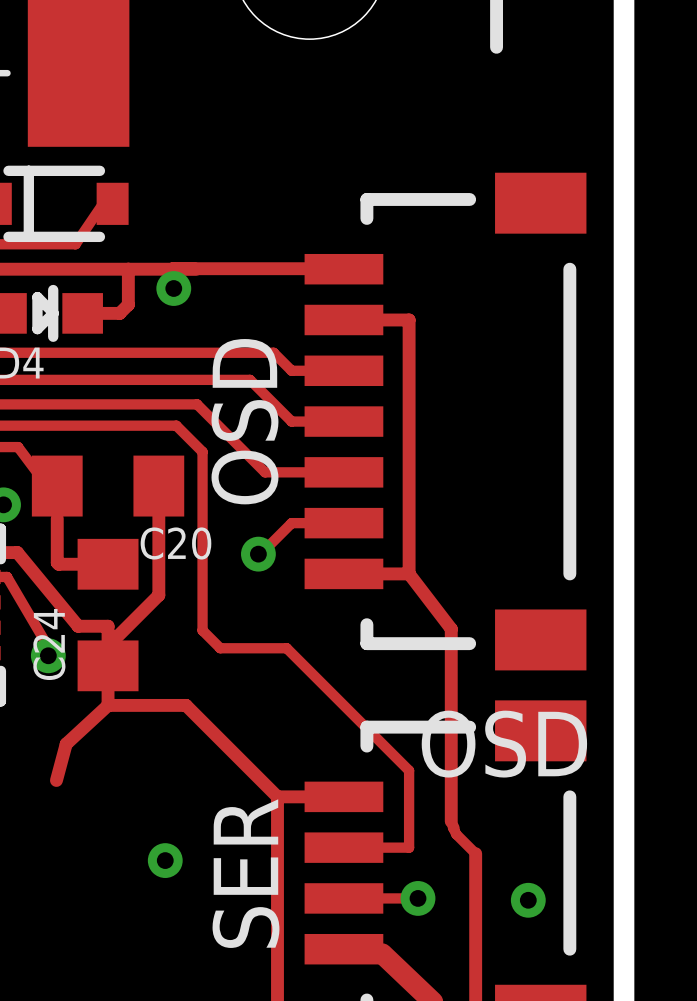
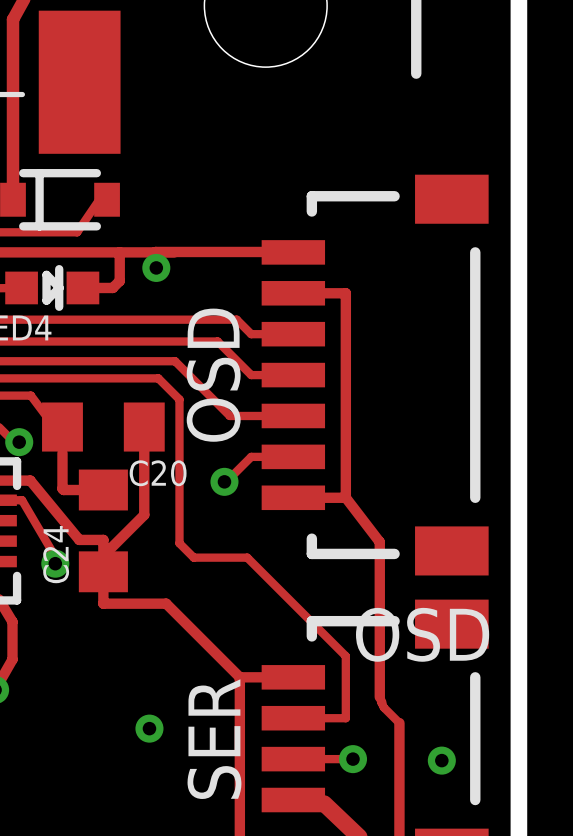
track: (108, 705) (66, 744) (56, 780) -> none

